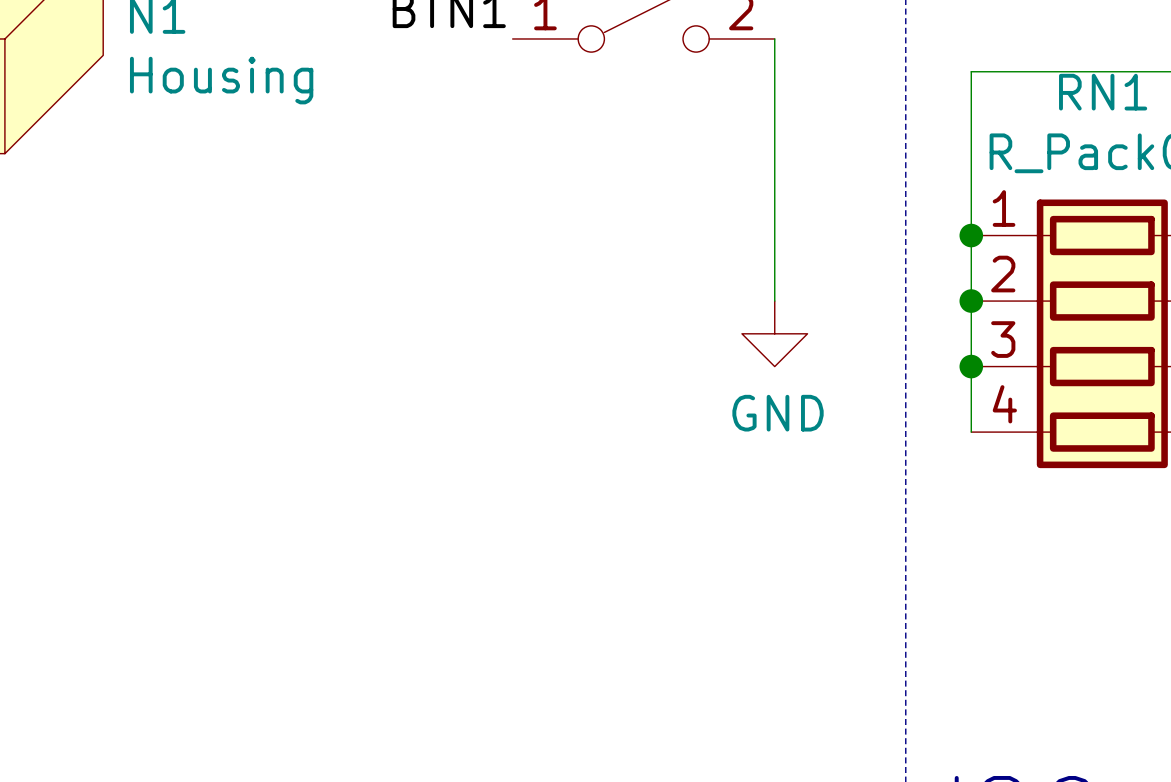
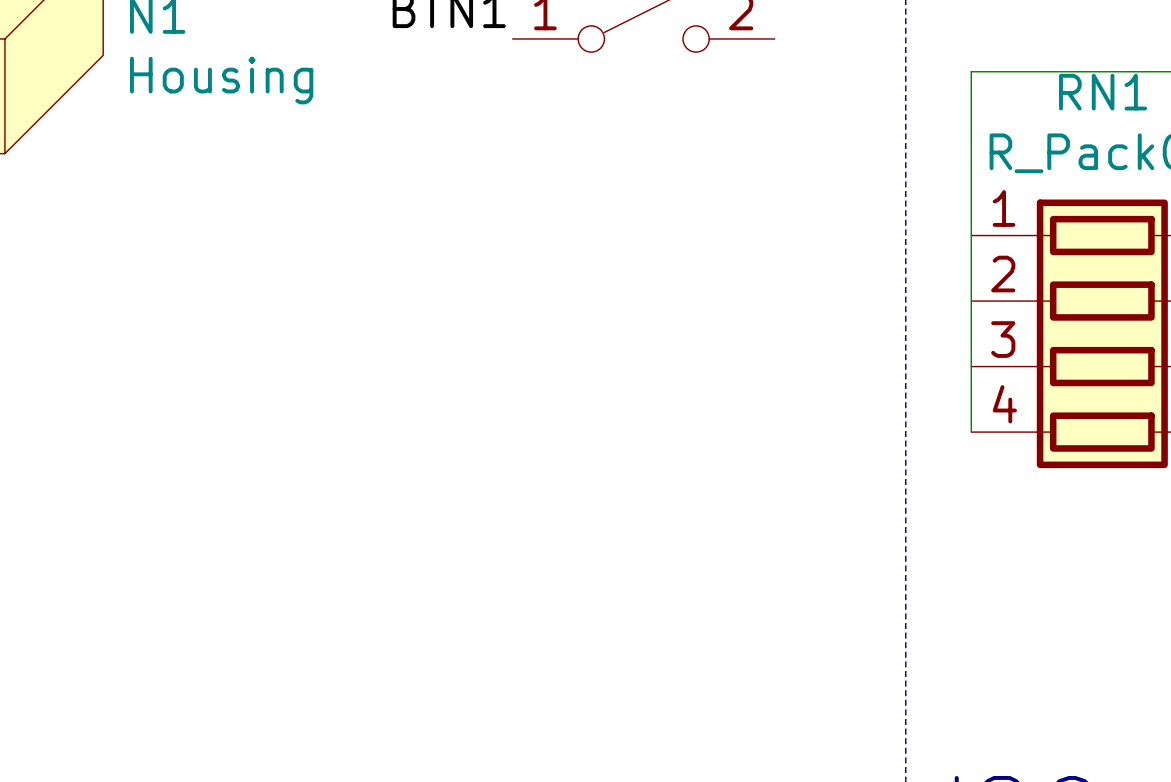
wire: (774, 38) (774, 301) -> none
junction: (971, 235) -> none
junction: (971, 301) -> none
power symbol: GND (774, 333) -> none
junction: (971, 366) -> none

